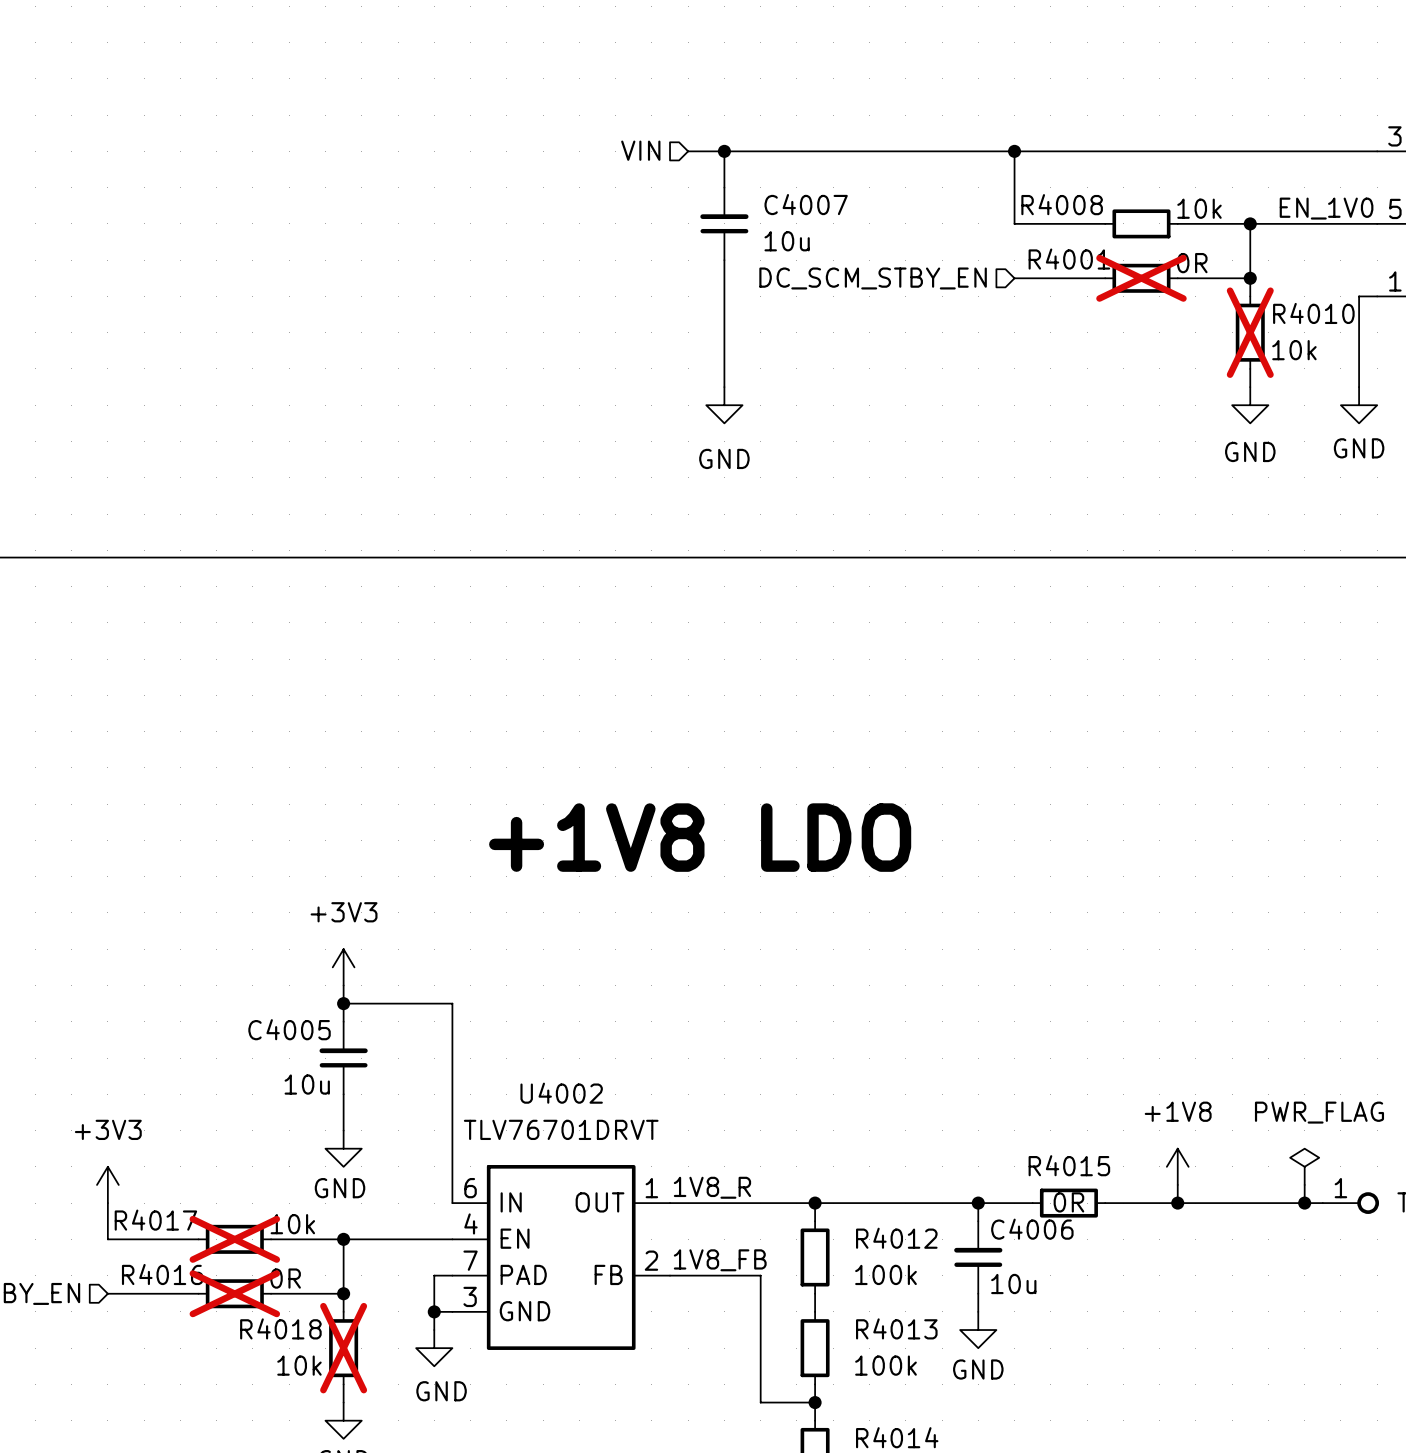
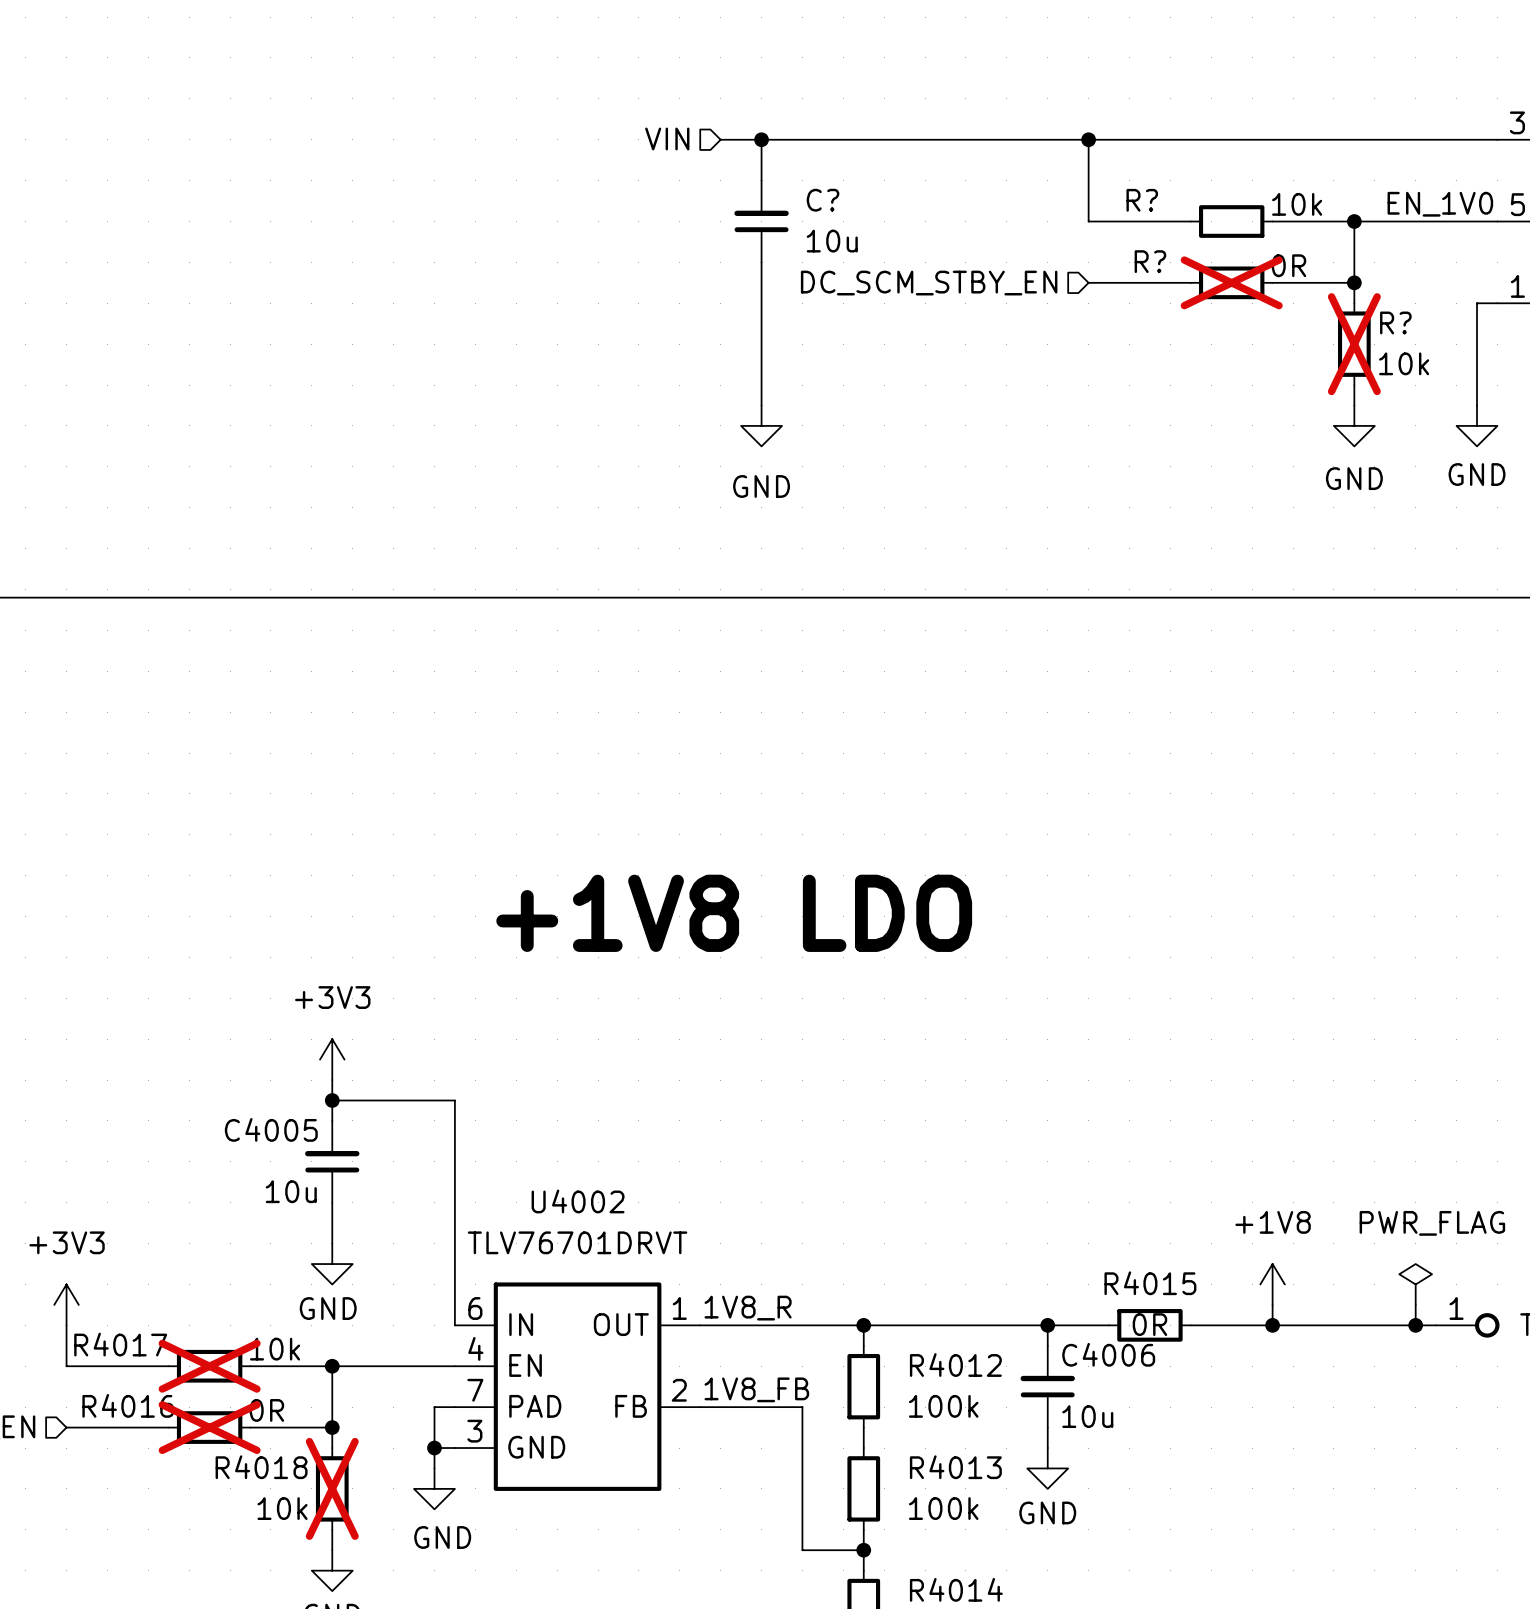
C4007 name: C4007 (806, 204) -> C? (823, 200)
R4008 name: R4008 (1062, 204) -> R? (1142, 200)
R4001 name: R4001 (1069, 259) -> R? (1150, 261)
R4010 name: R4010 (1313, 313) -> R? (1395, 322)

